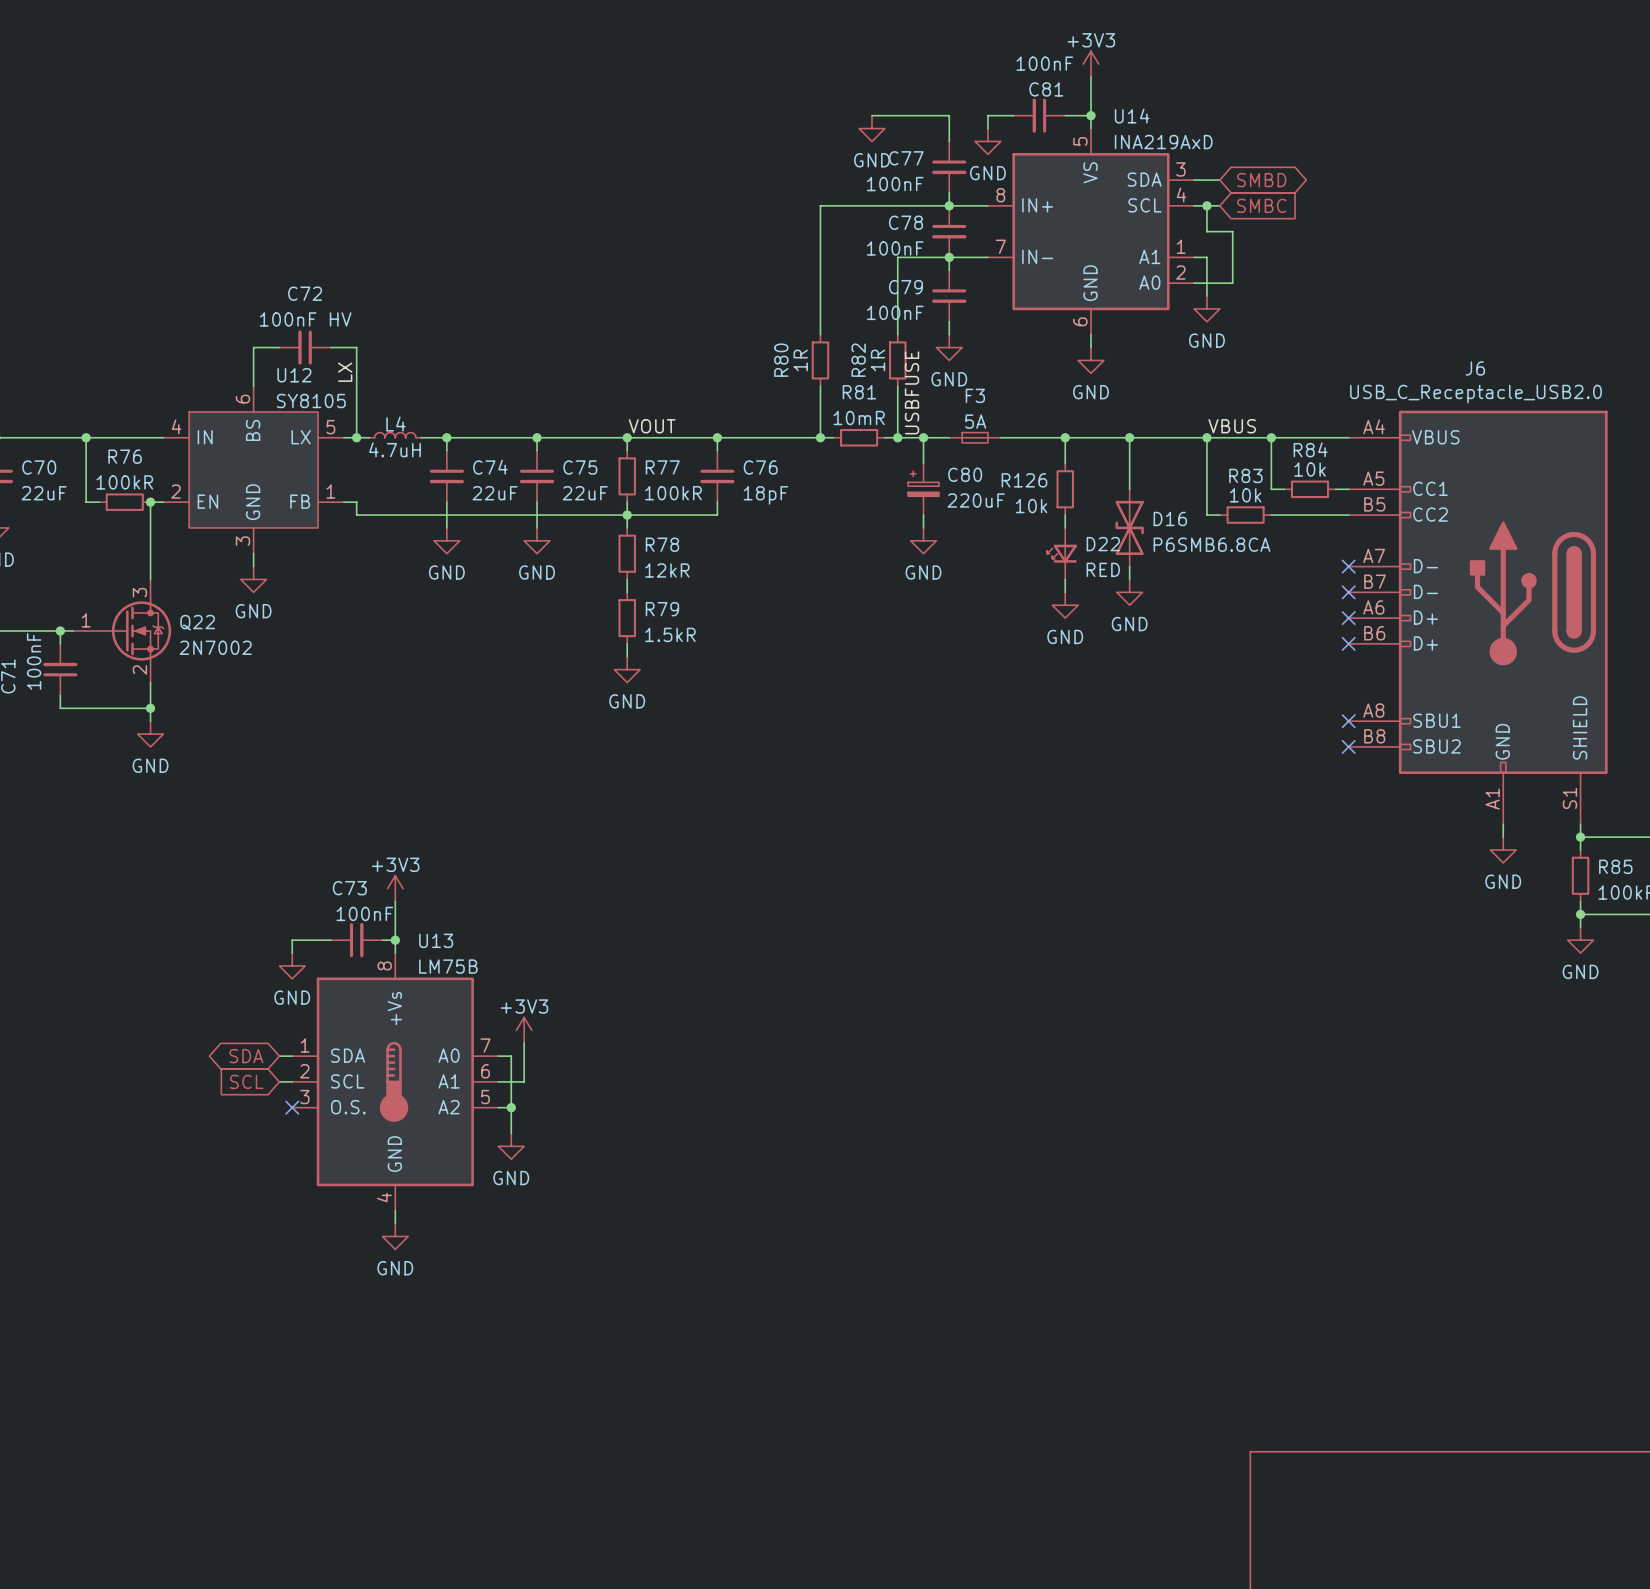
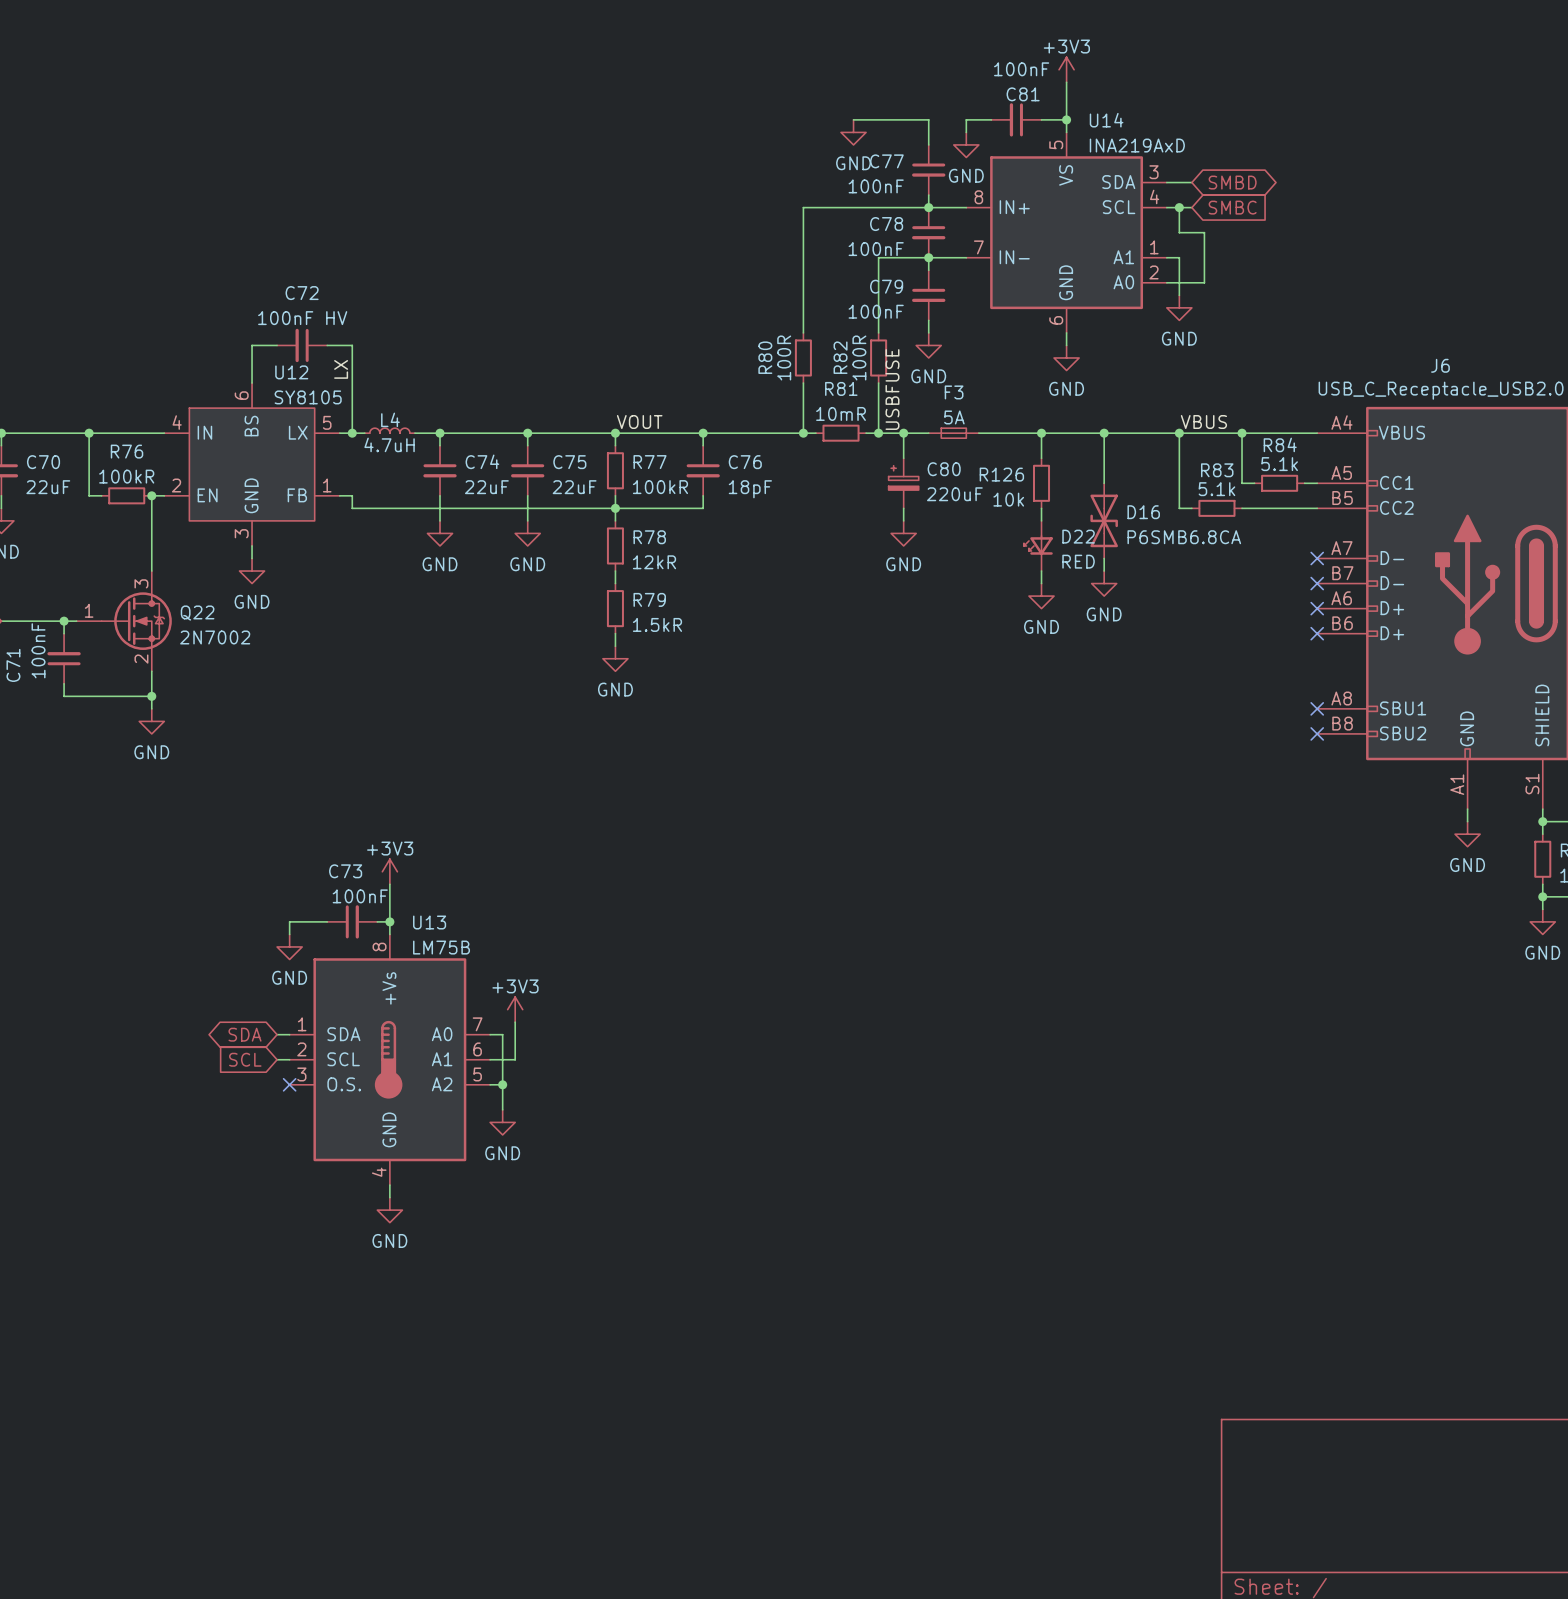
R80 value: 1R (800, 360) -> 100R (784, 357)
R82 value: 1R (878, 360) -> 100R (859, 357)
R84 value: 10k (1310, 469) -> 5.1k (1279, 464)
R83 value: 10k (1245, 495) -> 5.1k (1216, 489)

